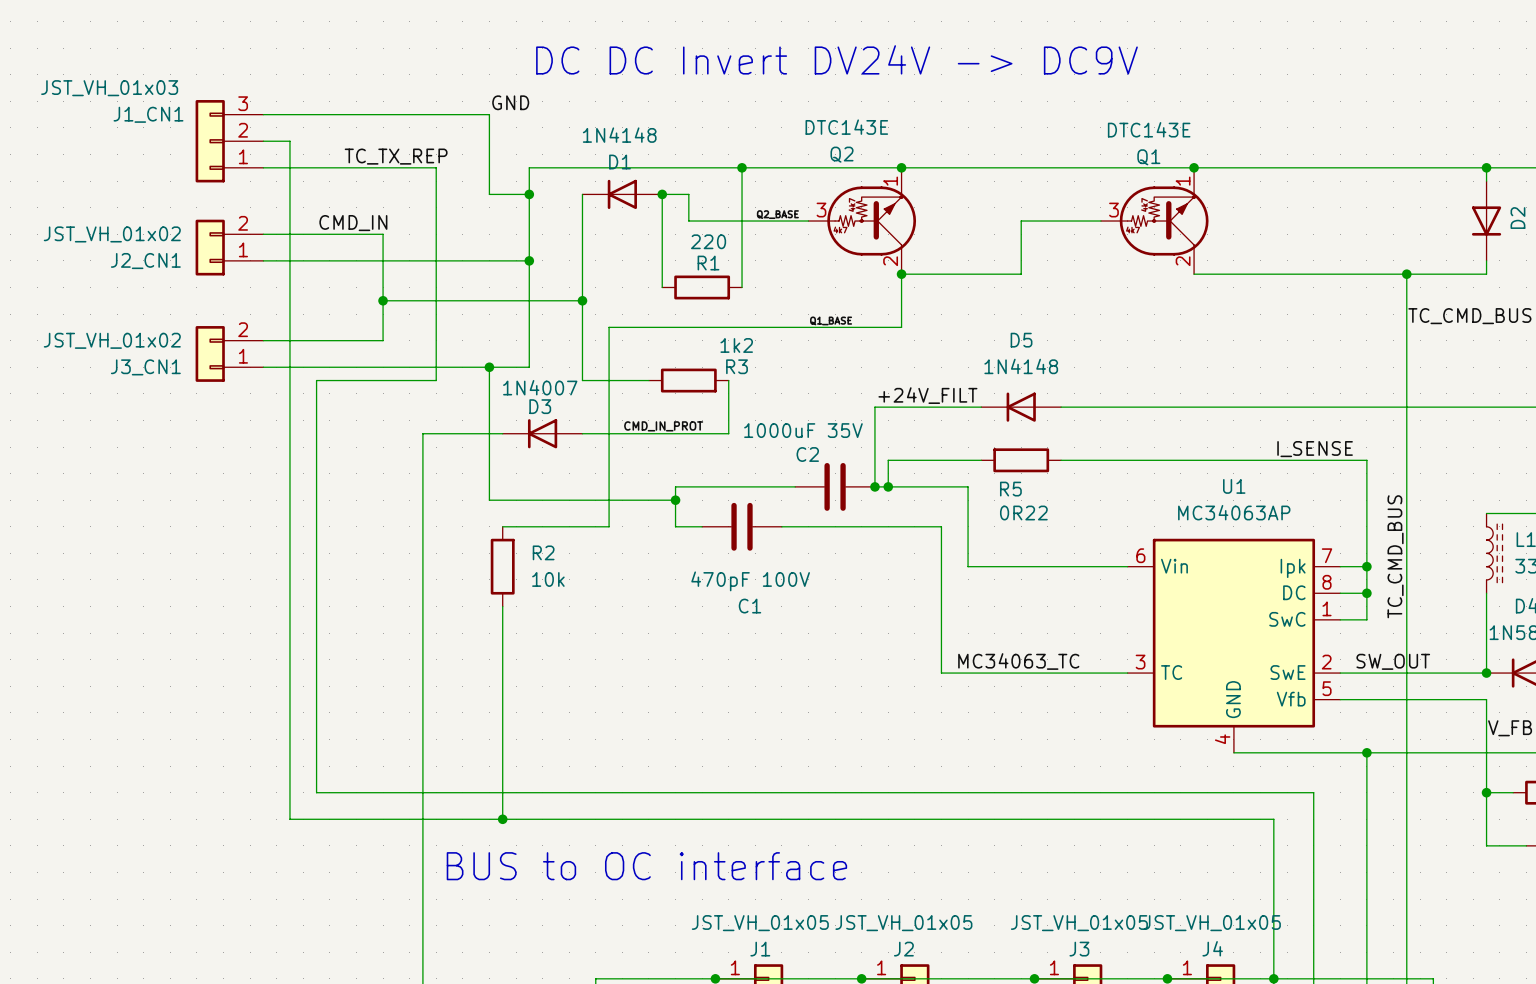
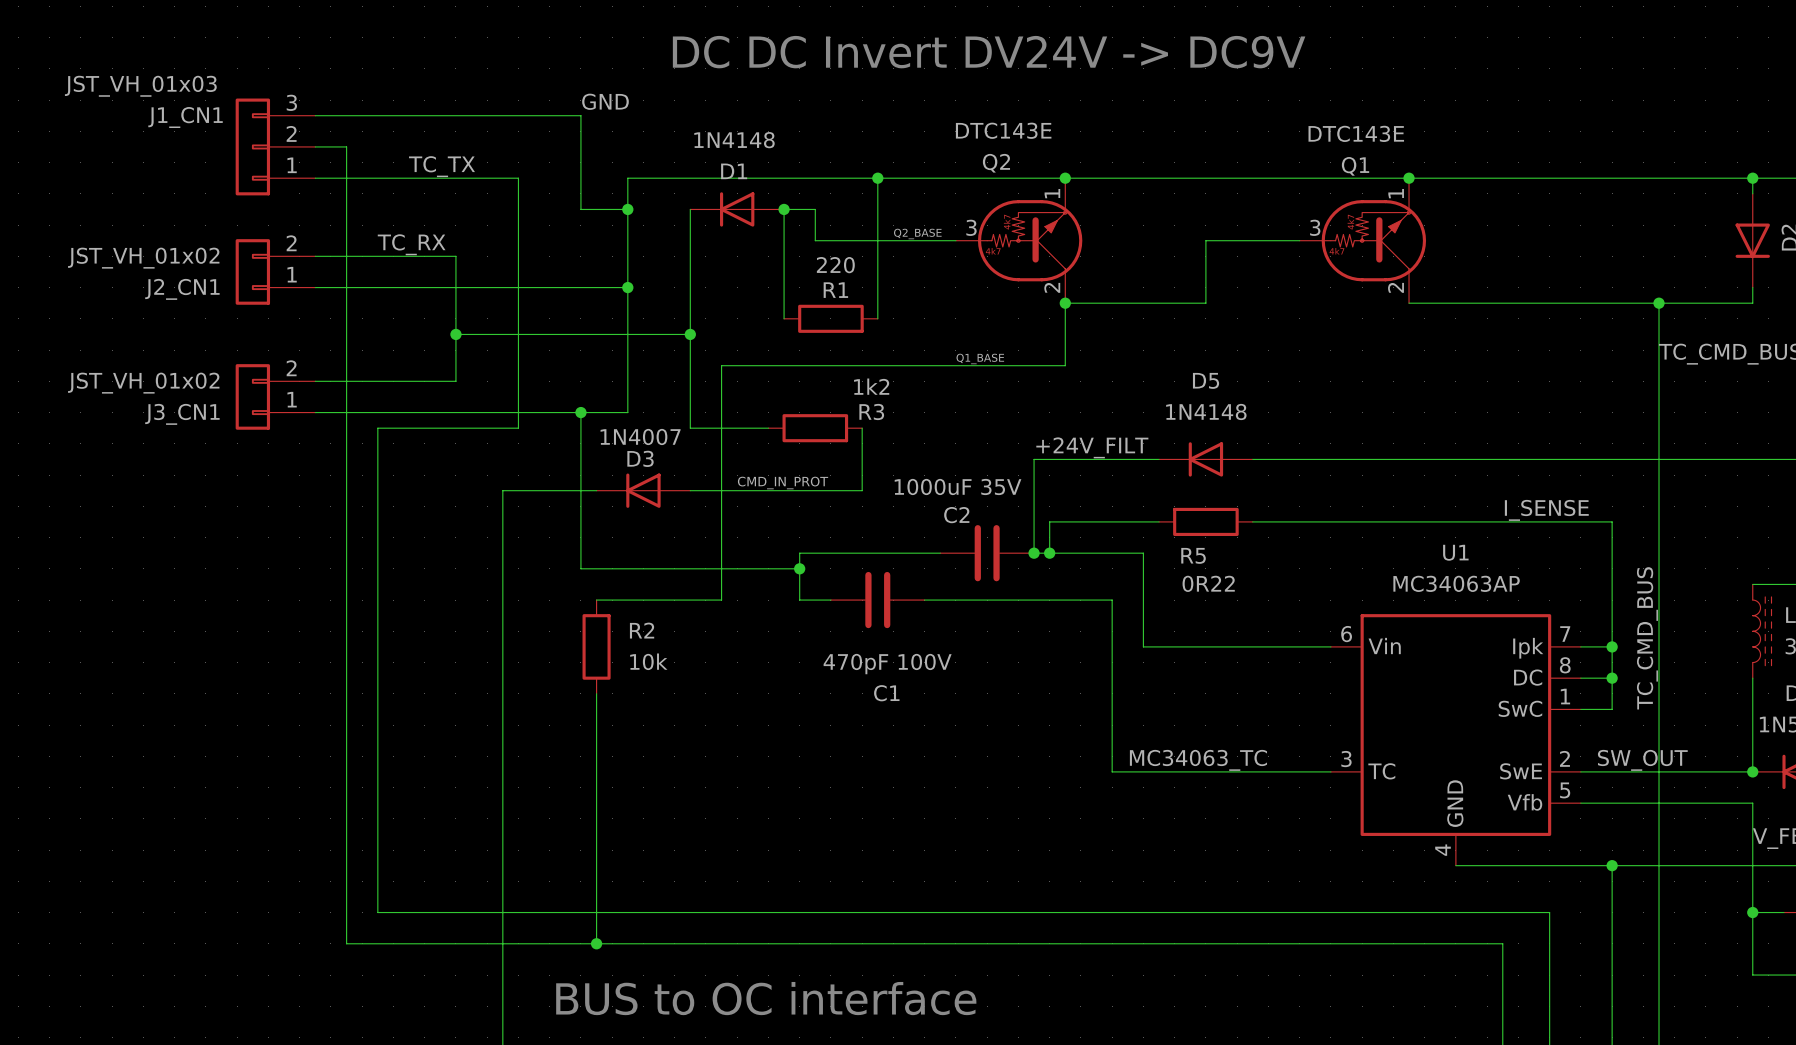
label: TC_TX_REP (396, 156) -> TC_TX (441, 166)
label: CMD_IN (353, 223) -> TC_RX (411, 244)

